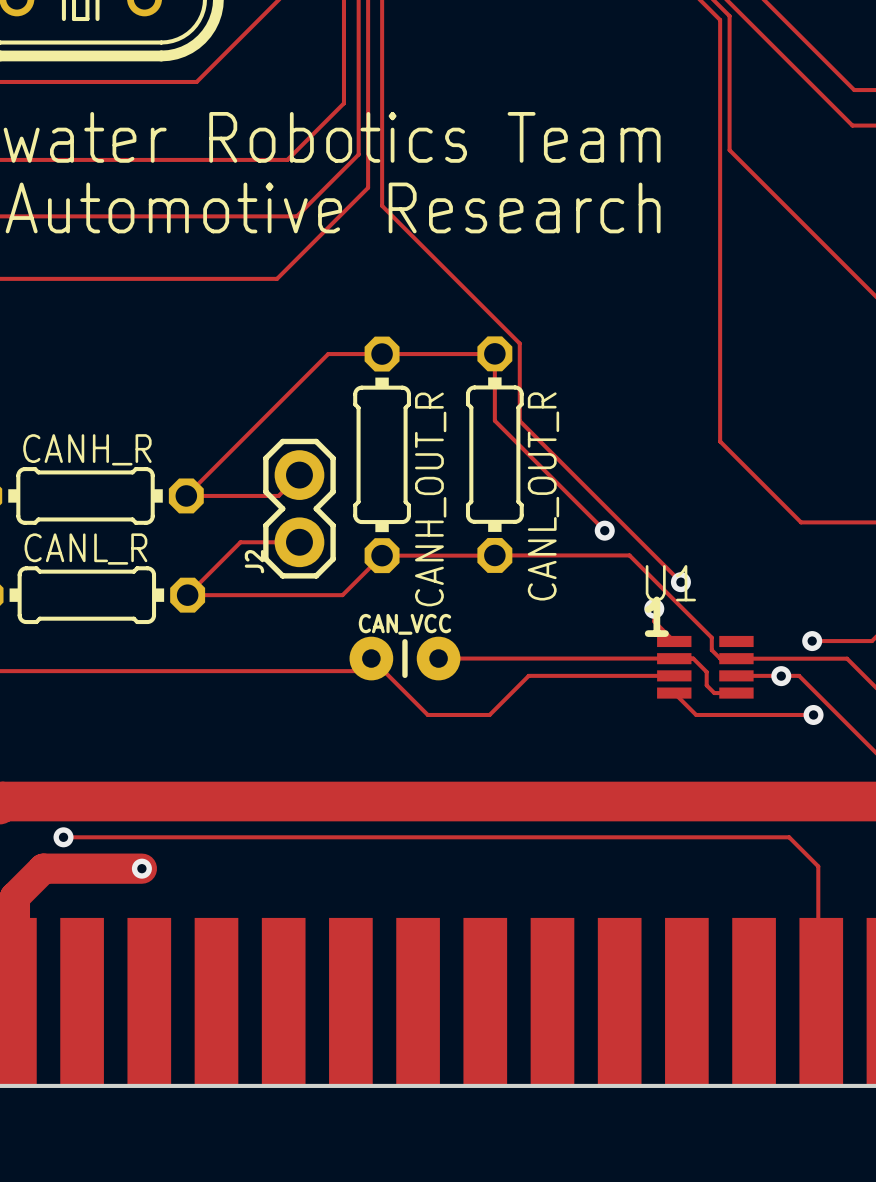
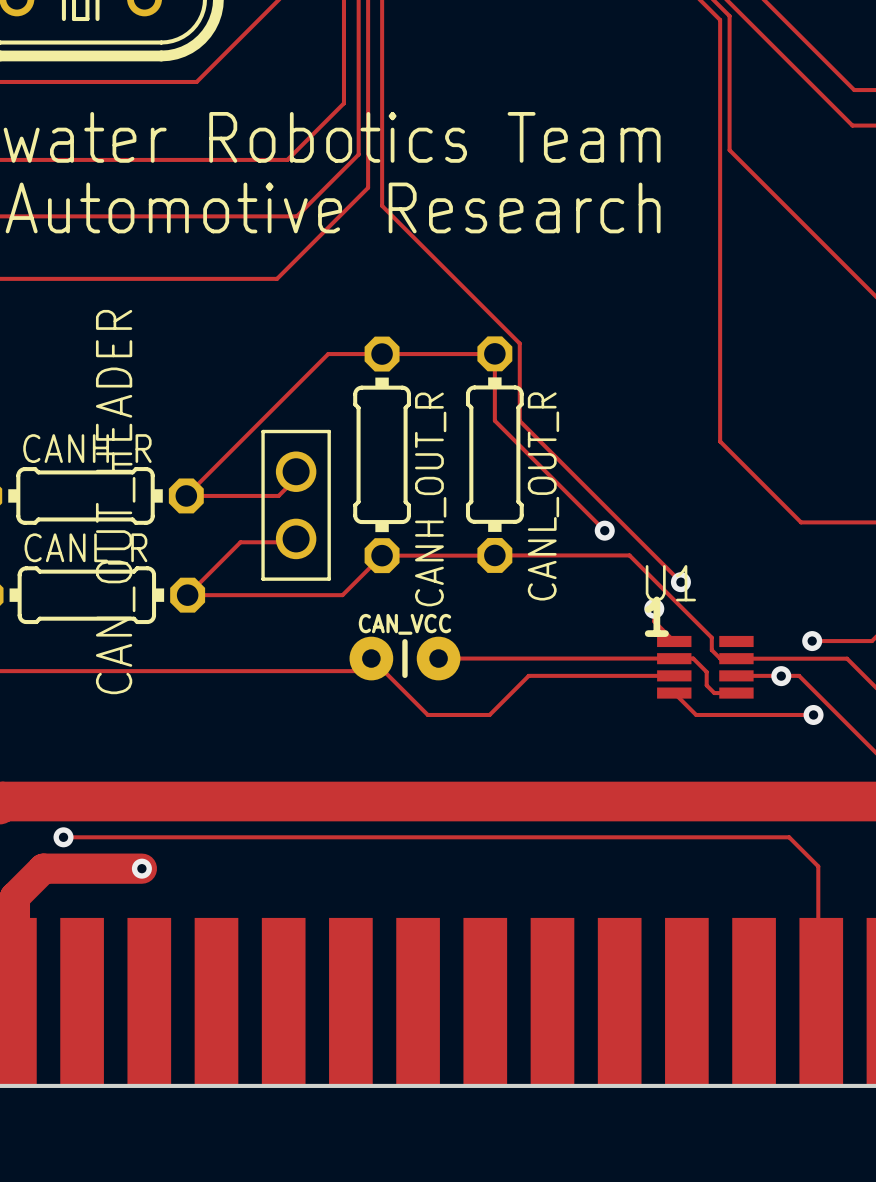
CAN_OUT_HEADER: none -> (296, 505)
J2: (299, 508) -> none

